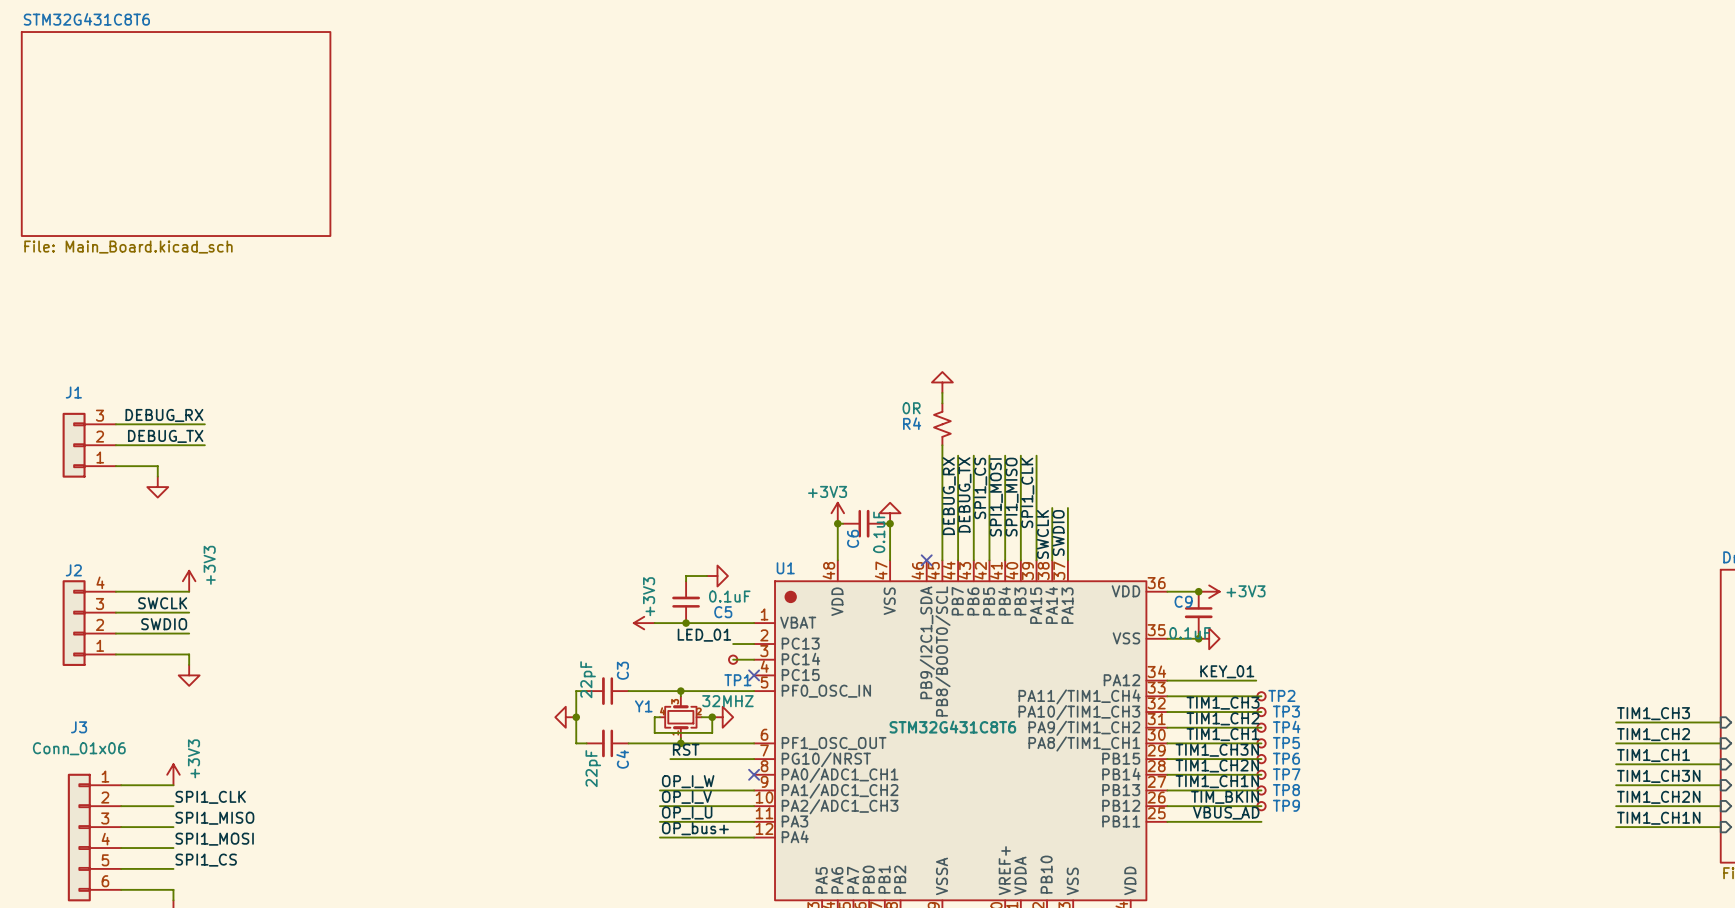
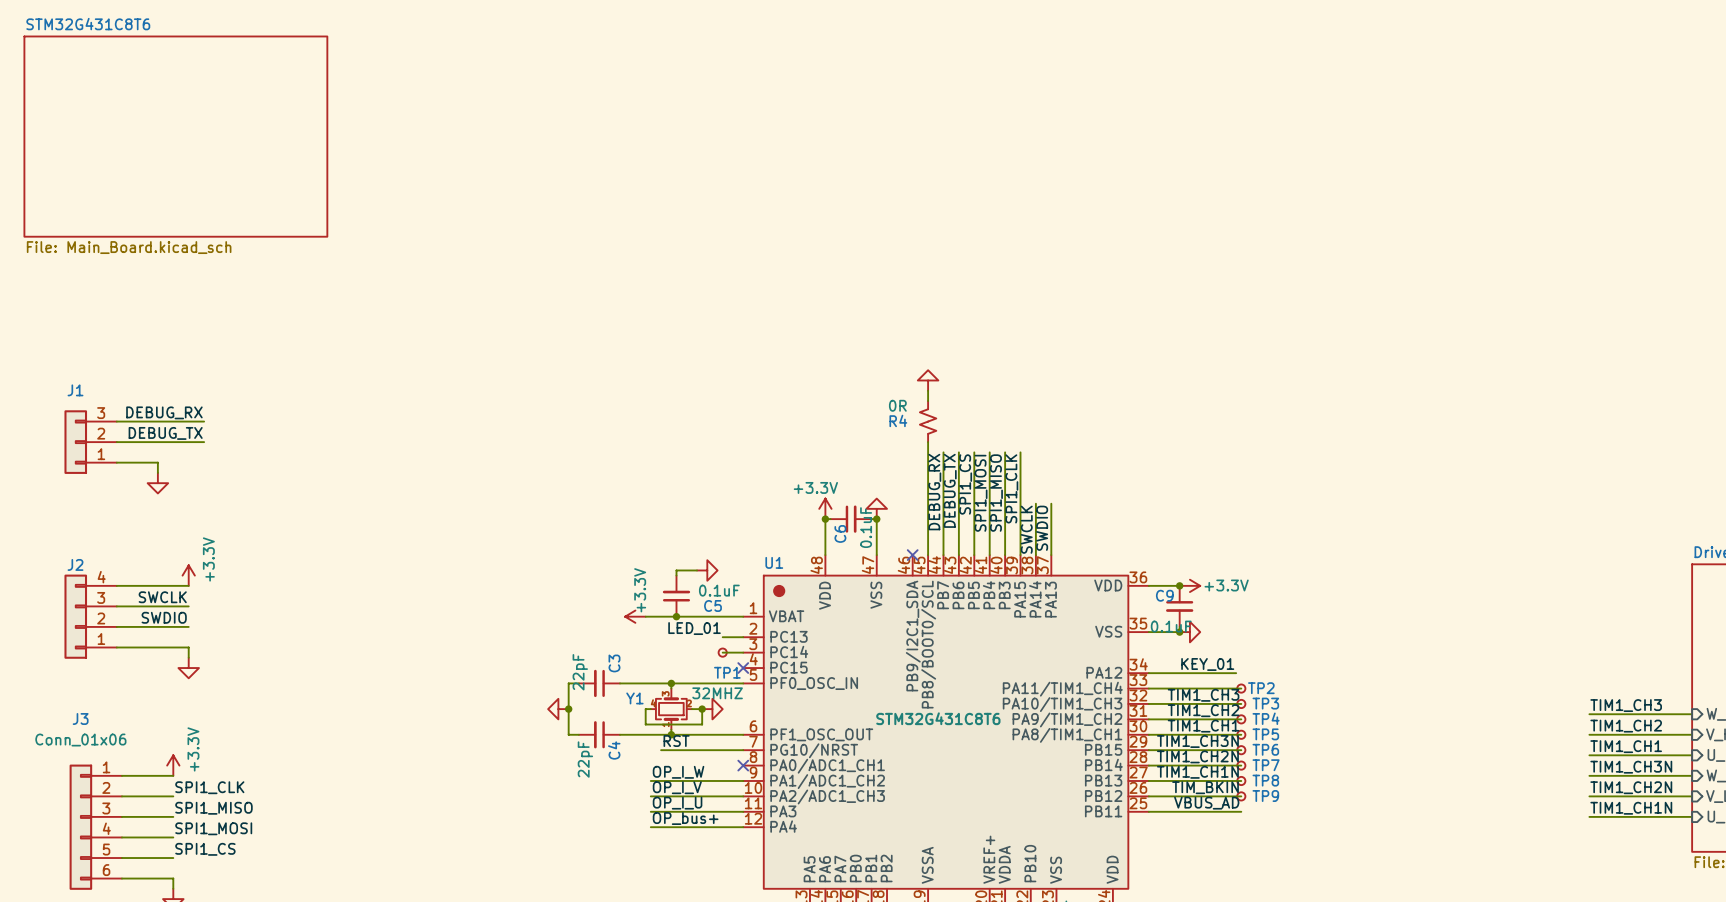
power symbol: +3V3 (837, 513) -> +3.3V (825, 508)
power symbol: +3V3 (189, 581) -> +3.3V (188, 575)
power symbol: +3V3 (1209, 591) -> +3.3V (1189, 585)
power symbol: +3V3 (644, 623) -> +3.3V (635, 616)
power symbol: +3V3 (173, 774) -> +3.3V (173, 765)

